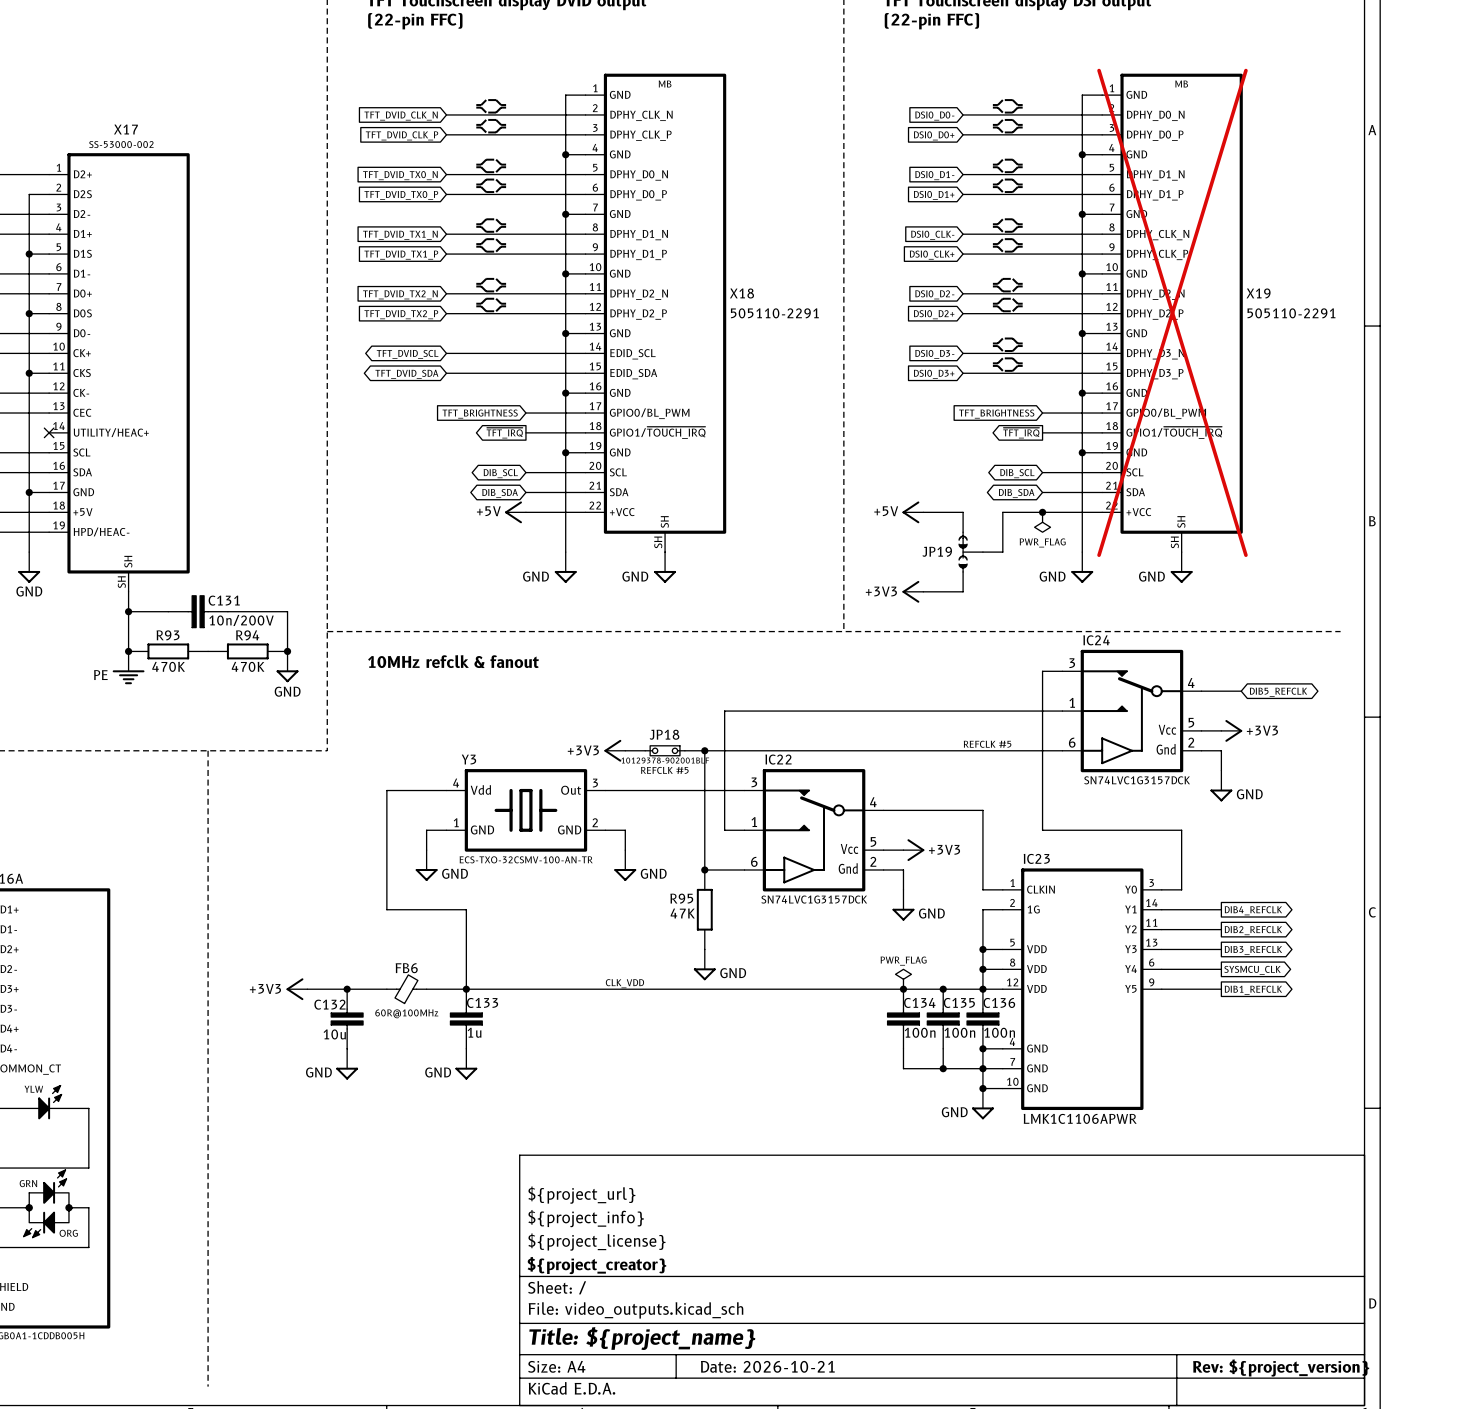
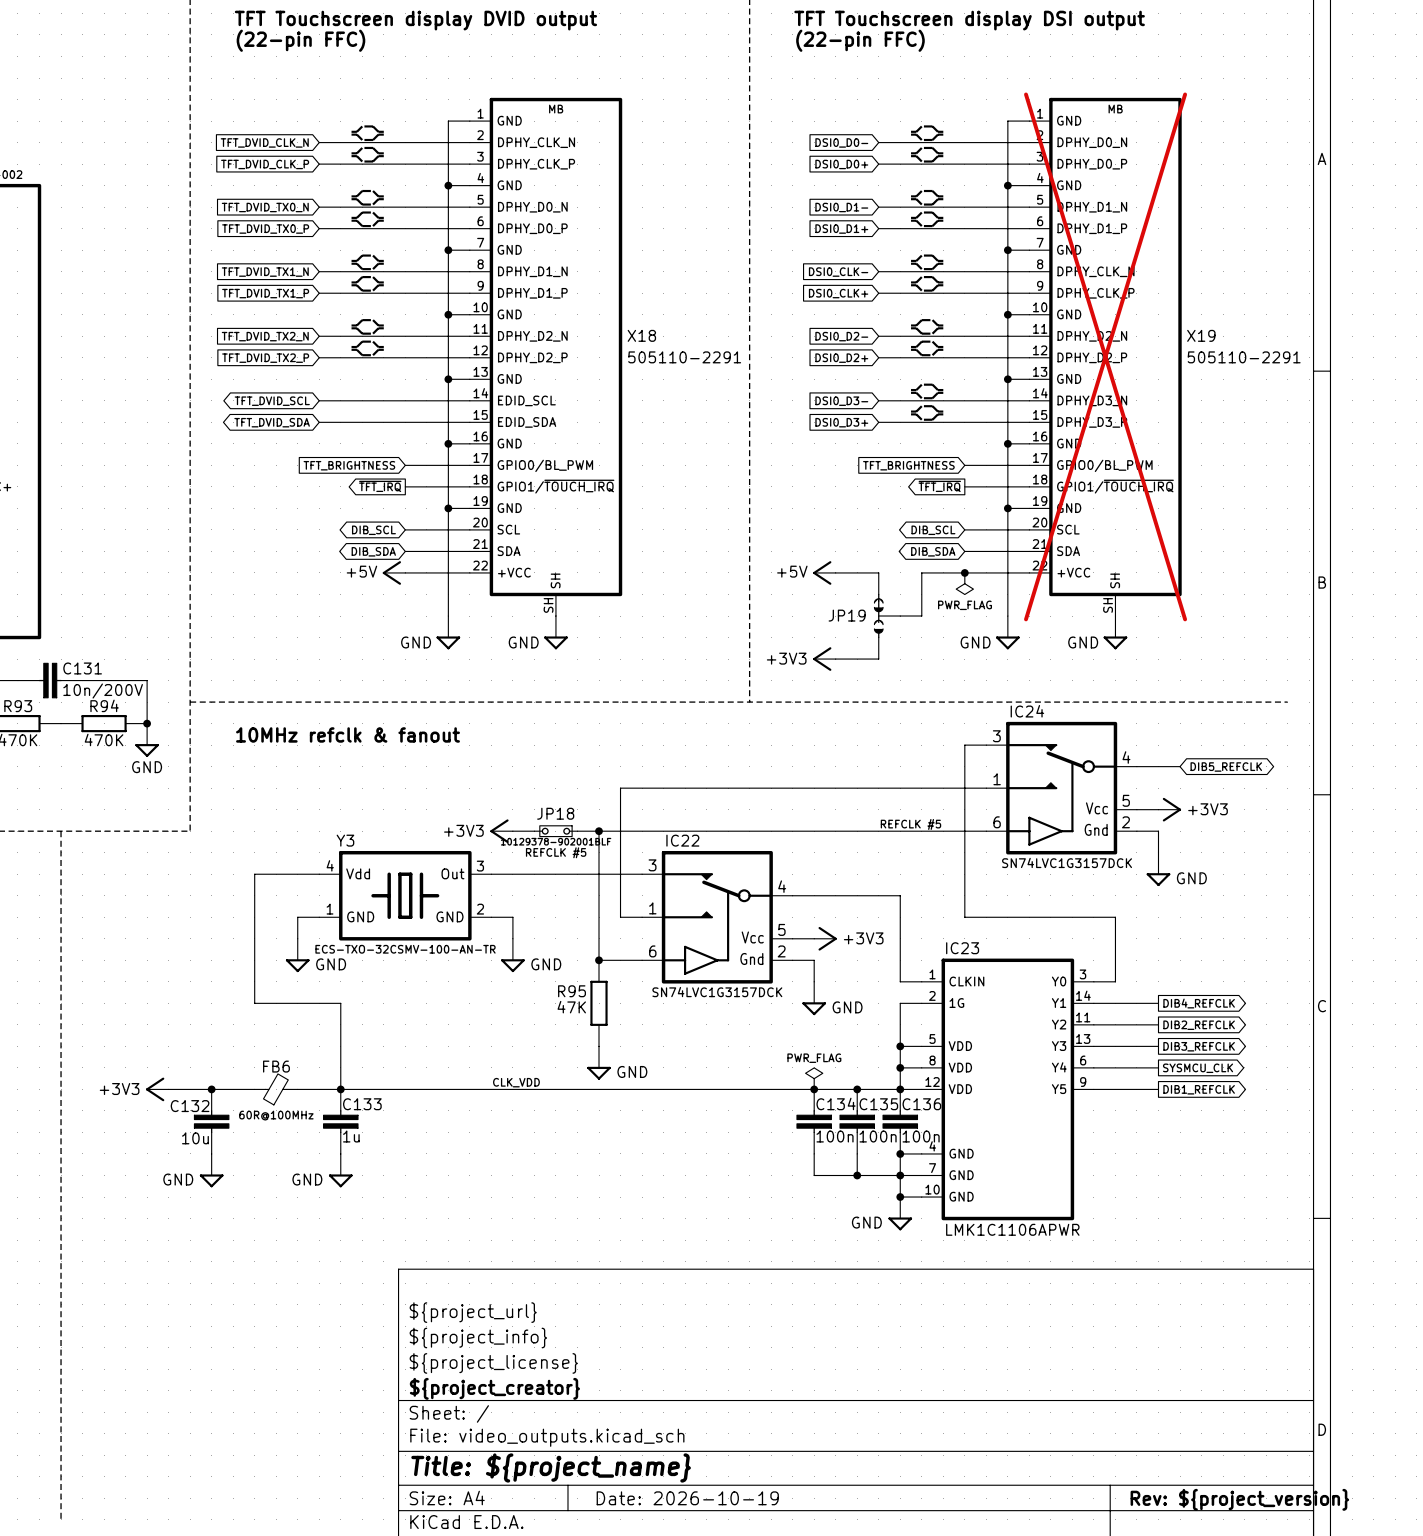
title block: Date: 2026-10-21 (767, 1366) -> Date: 2026-10-19 (687, 1498)

